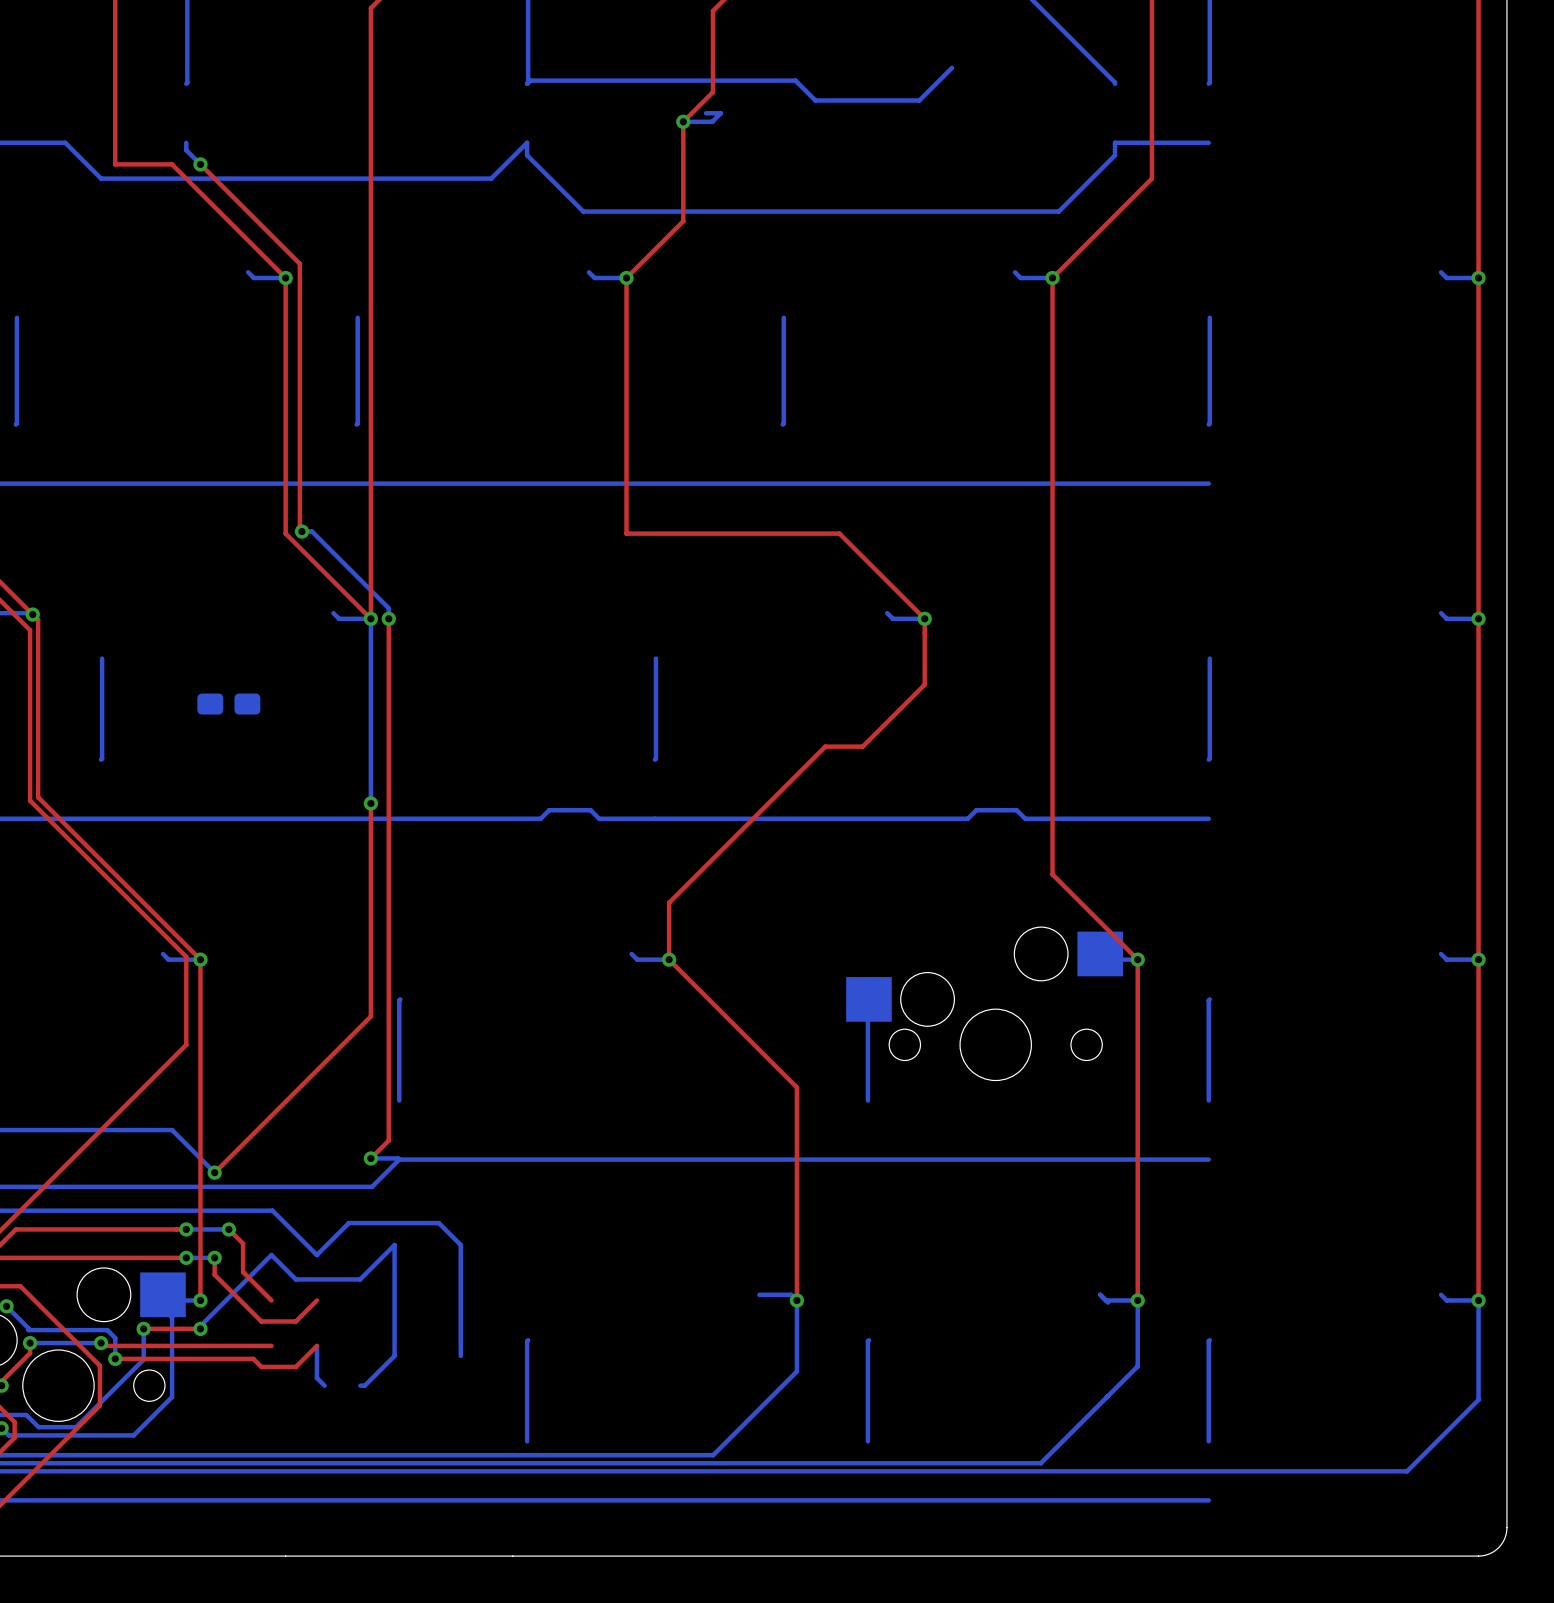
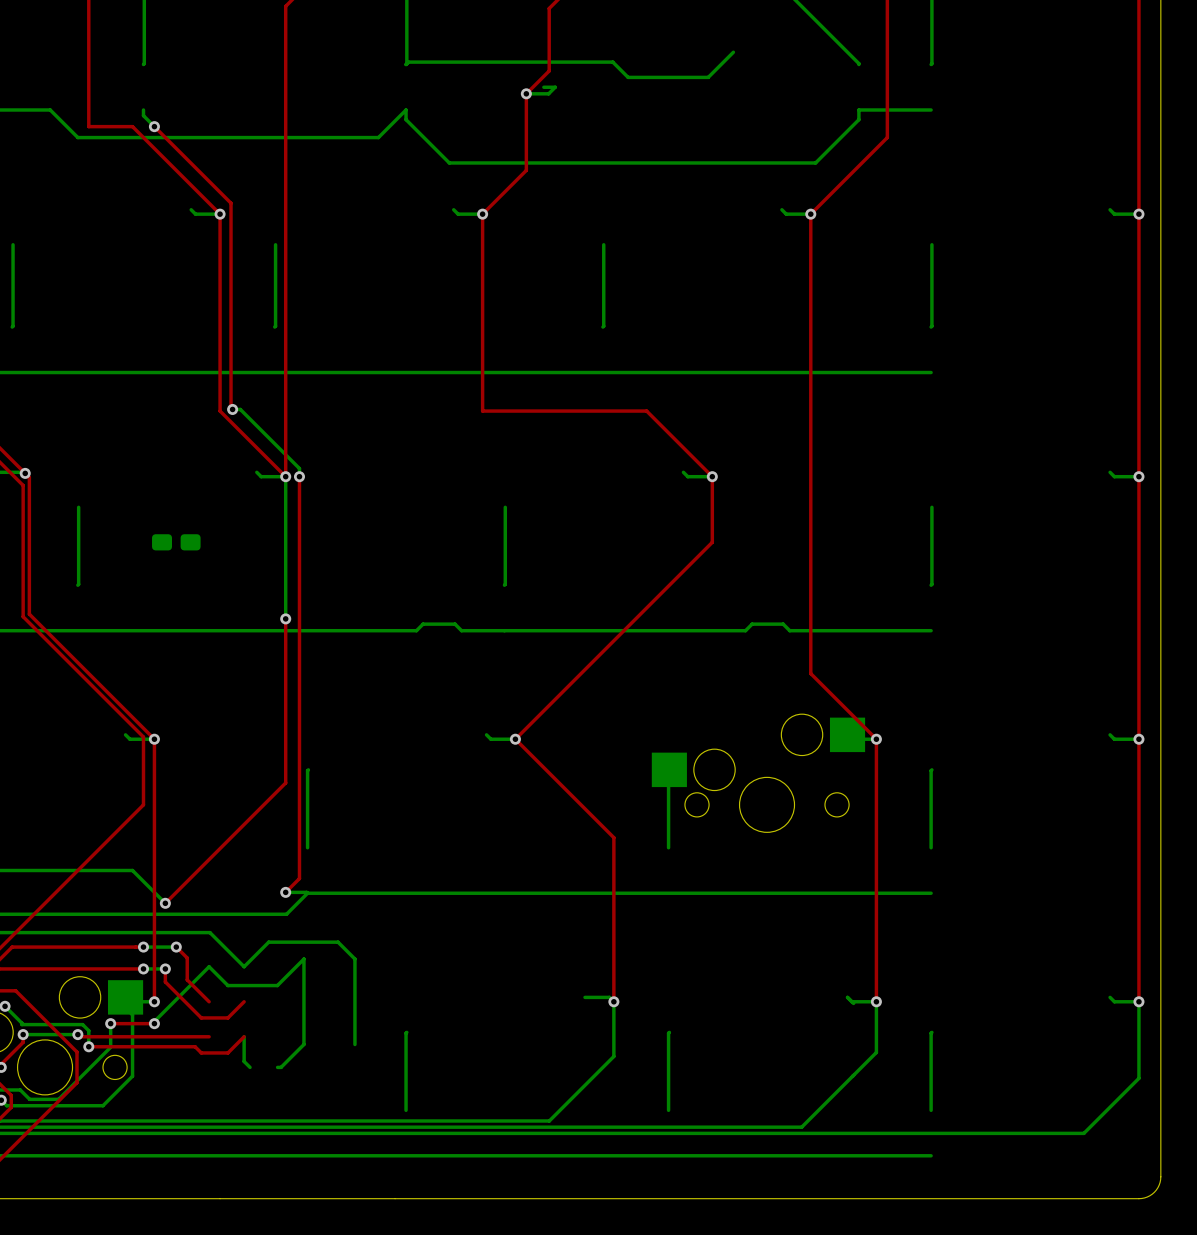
top track: (924, 684) (862, 746) (825, 746) (669, 902) (669, 959) -> (712, 527) (712, 542) (515, 739)

